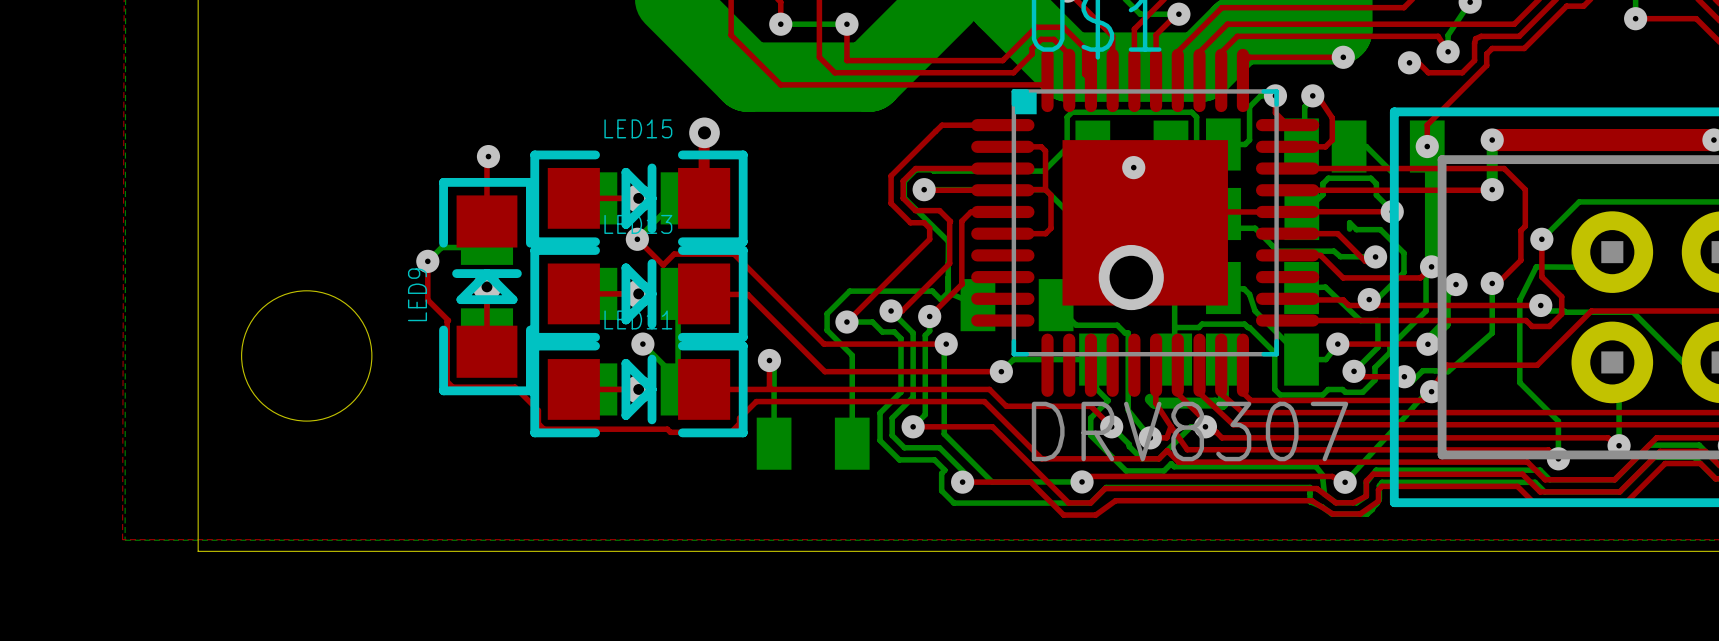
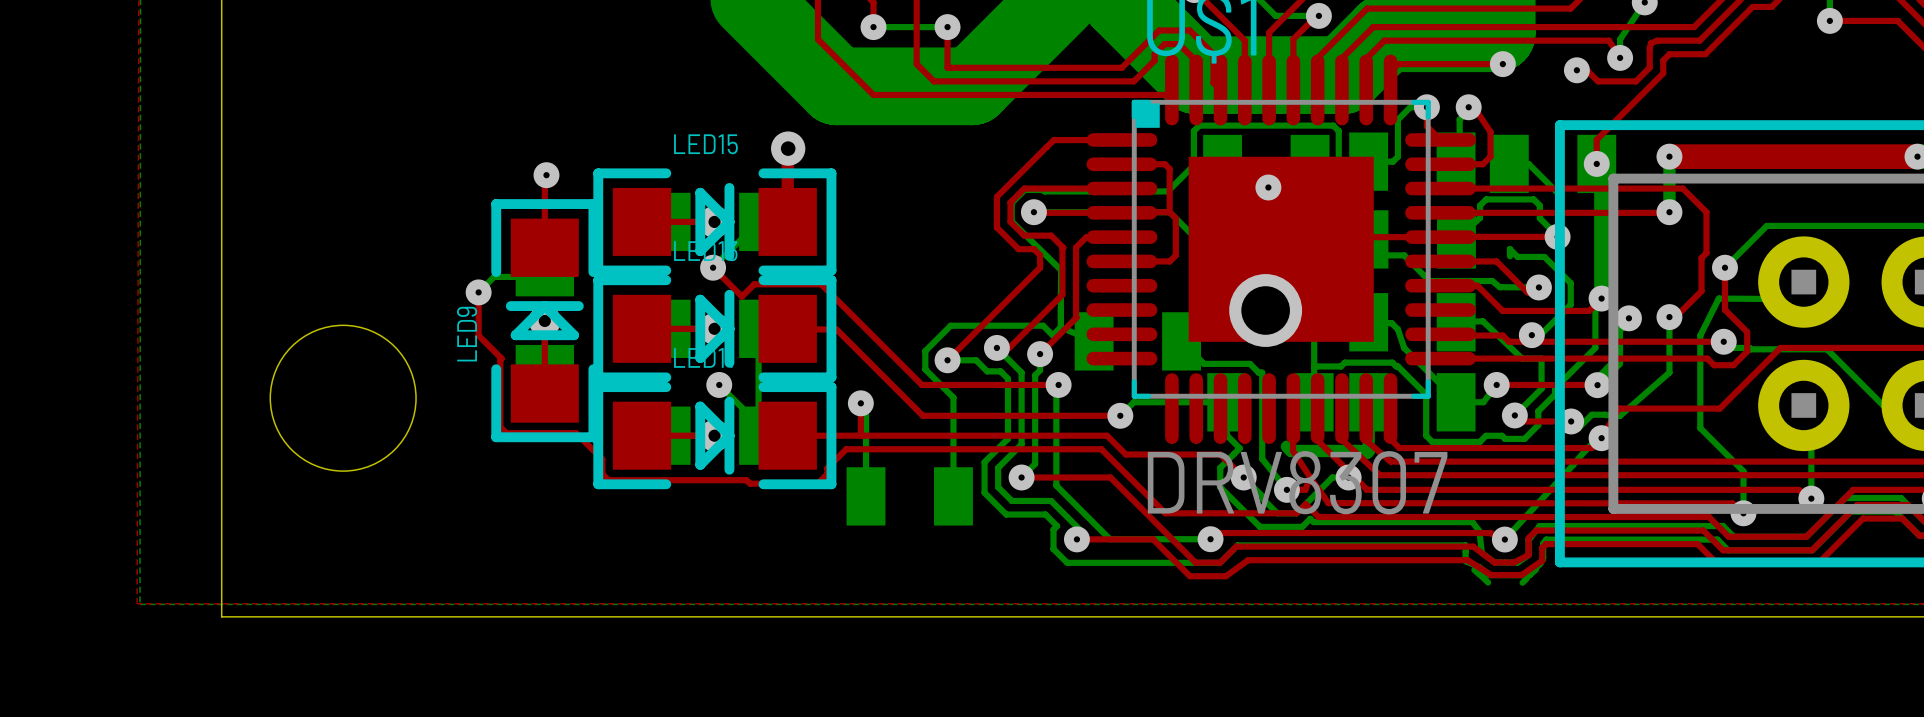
bottom track: none -> (1474, 570) (1488, 582)
bottom track: none -> (1526, 578) (1522, 582)

